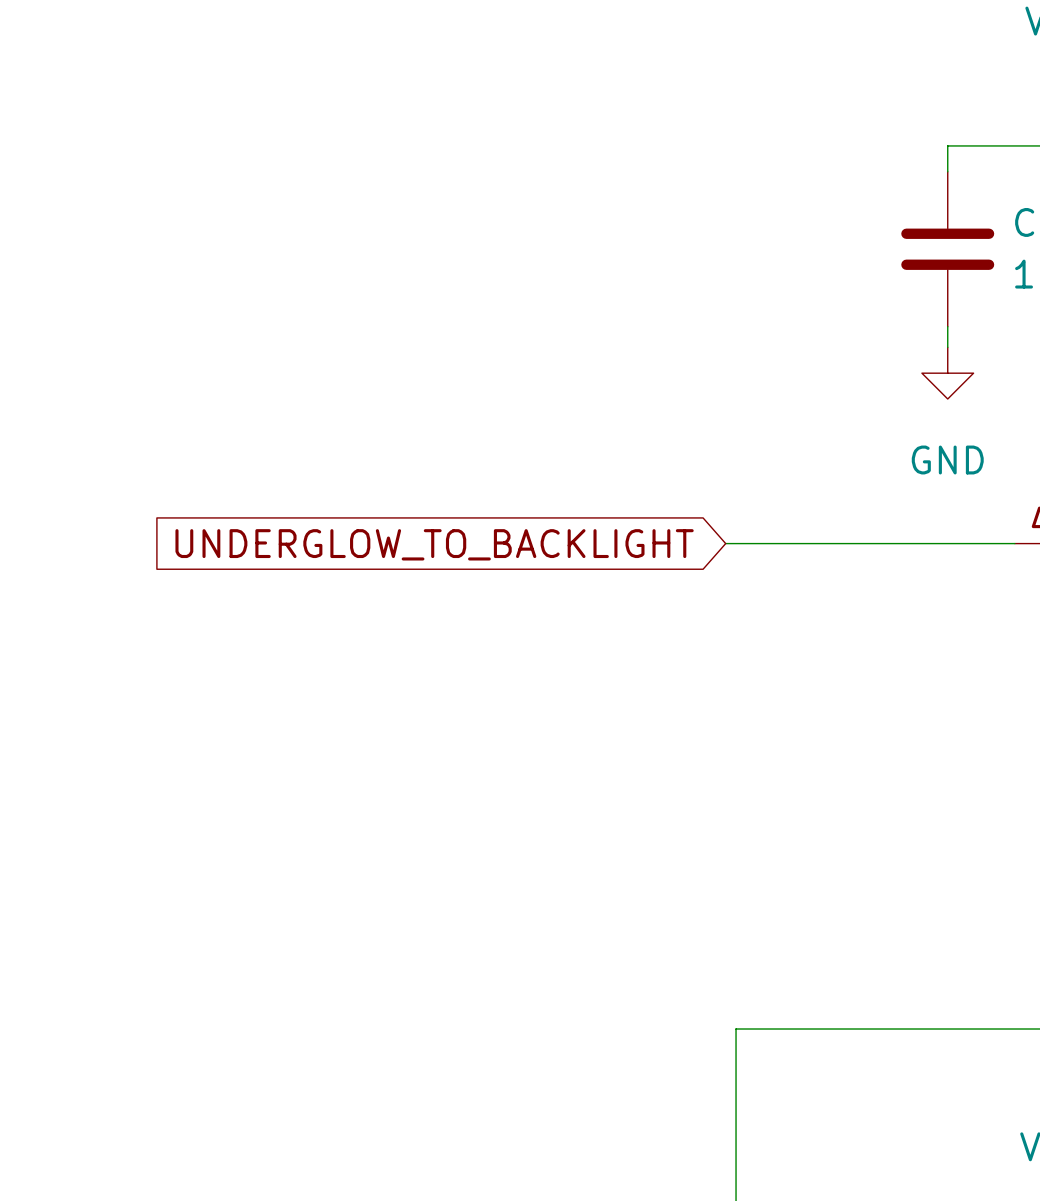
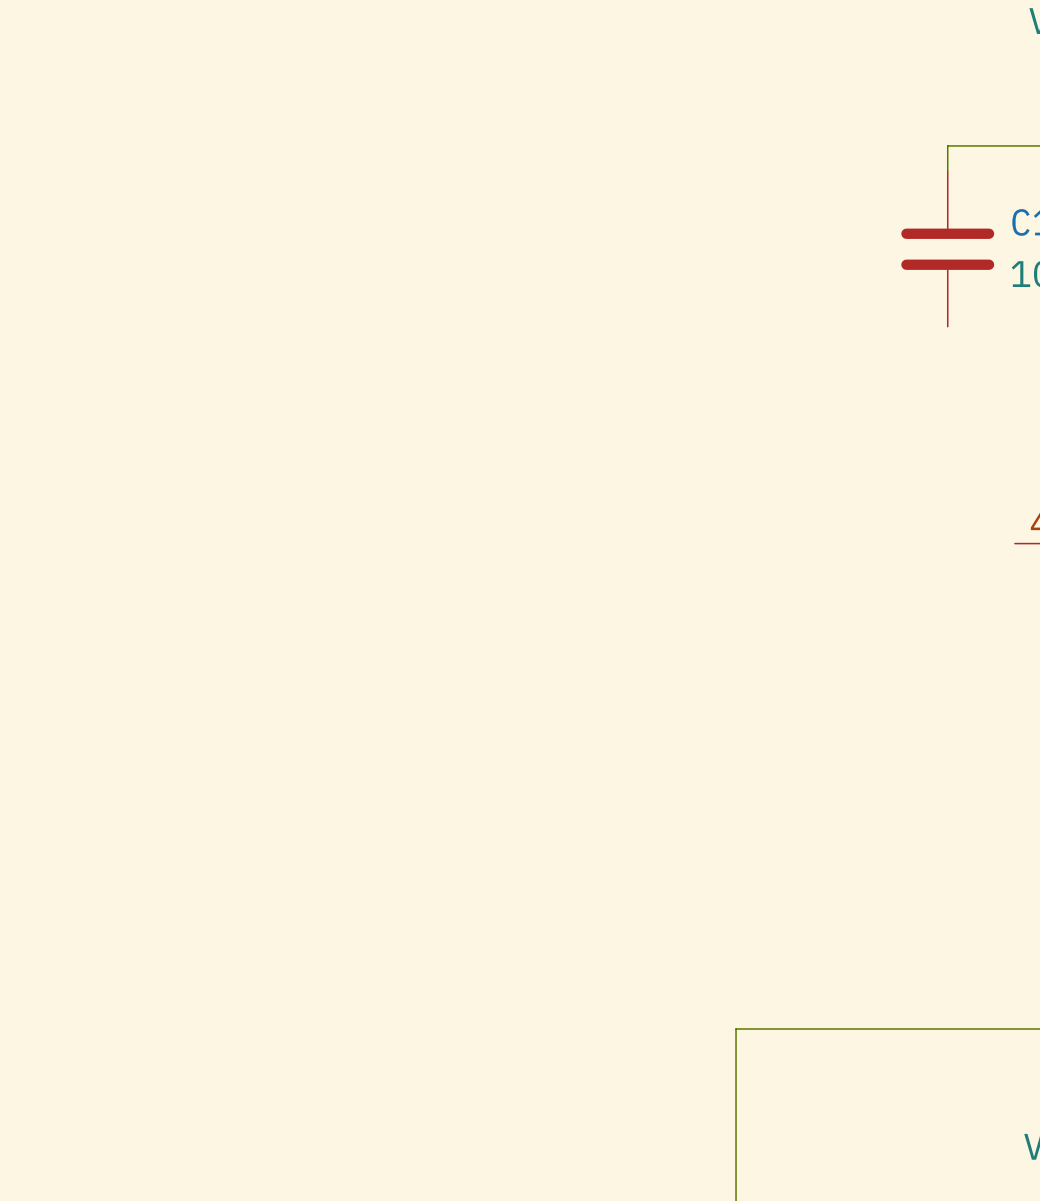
wire: (947, 326) (947, 347) -> none
power symbol: GND (947, 373) -> none
wire: (725, 543) (1014, 543) -> none
global label: UNDERGLOW_TO_BACKLIGHT (434, 544) -> none

